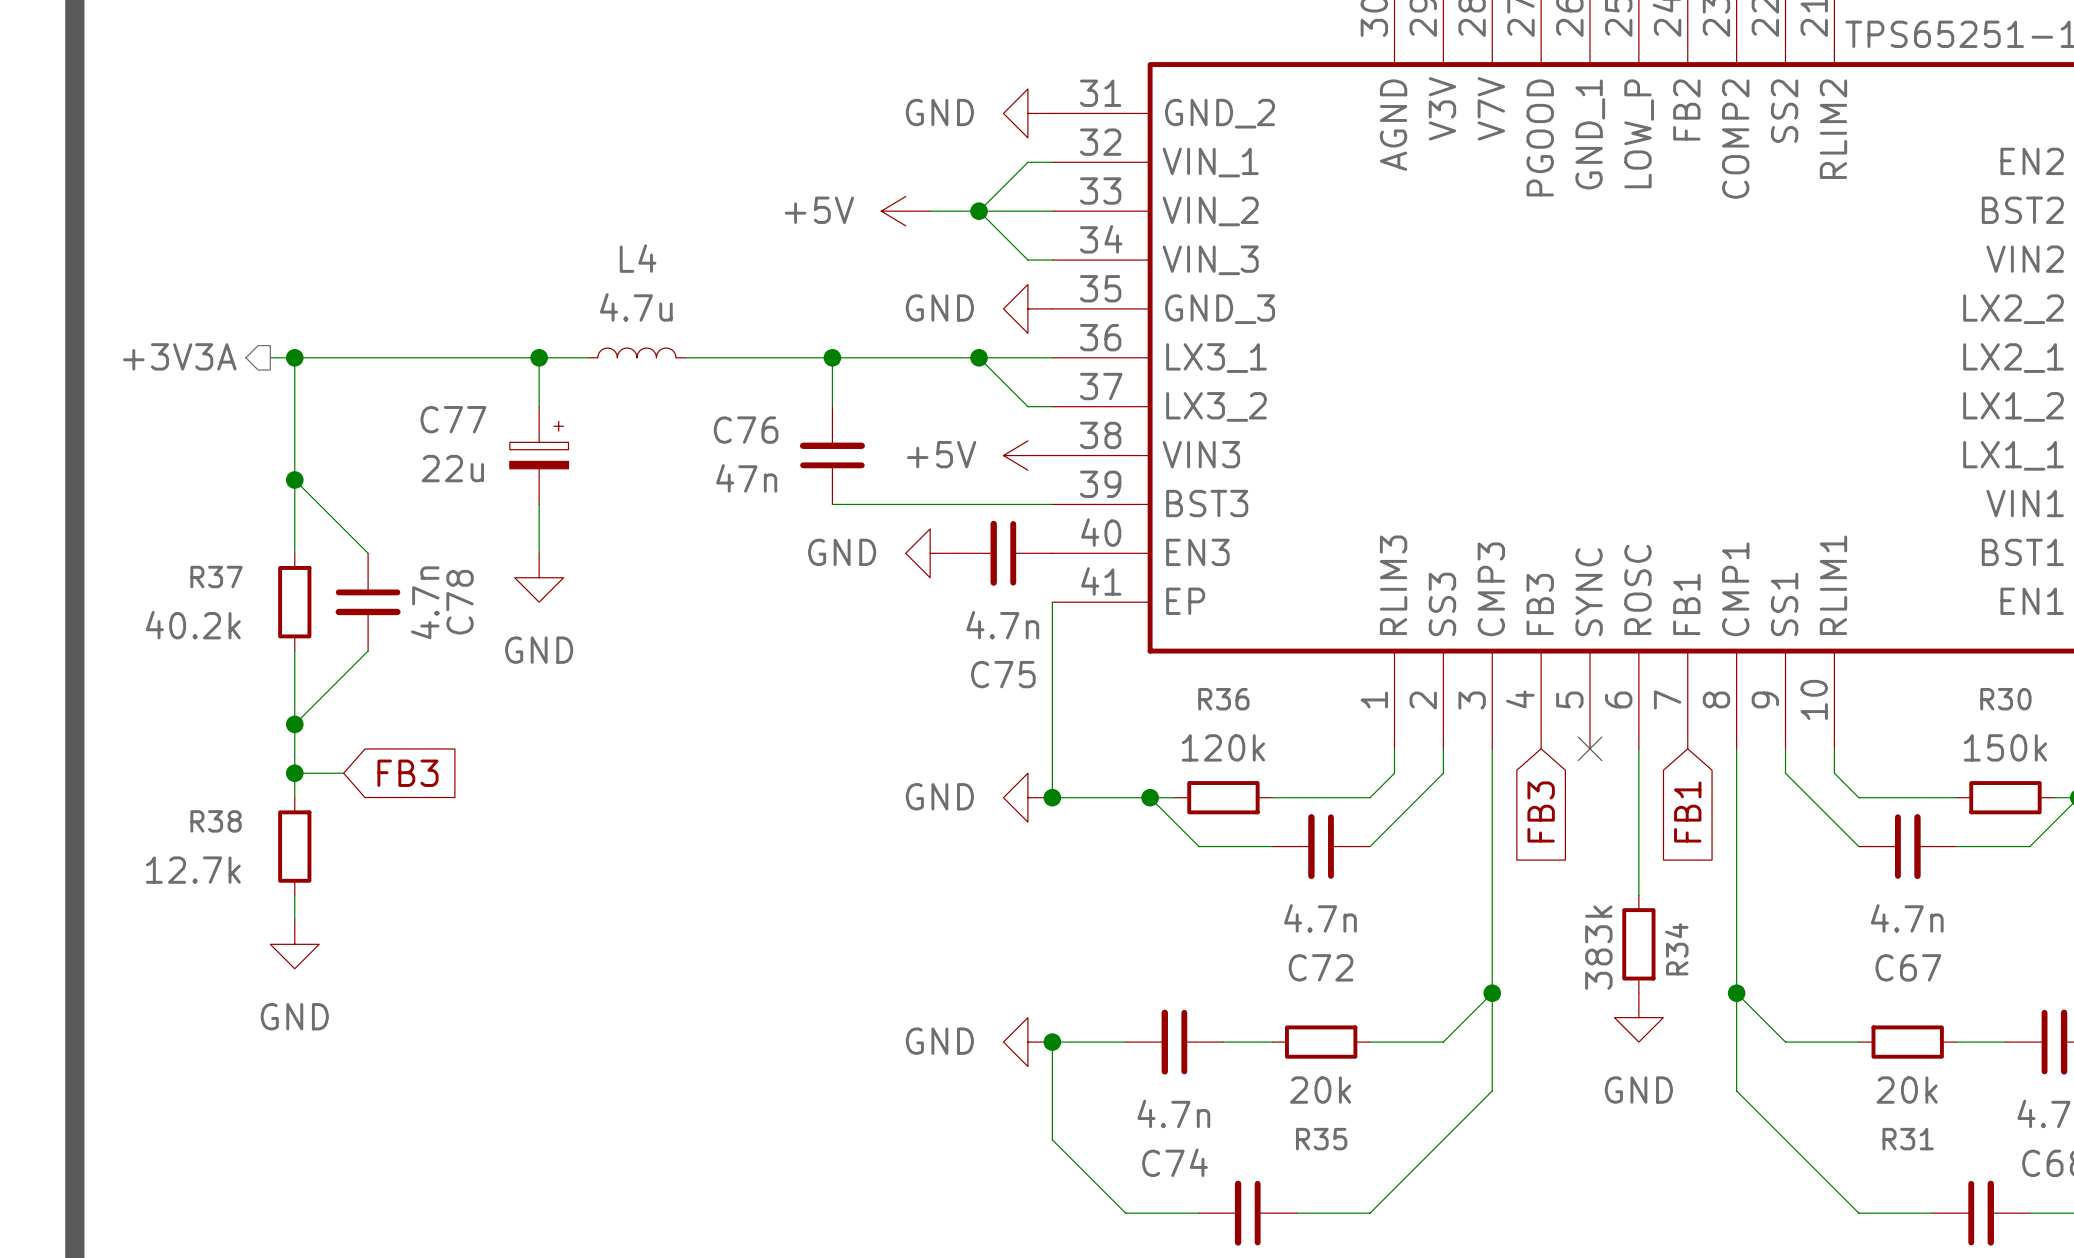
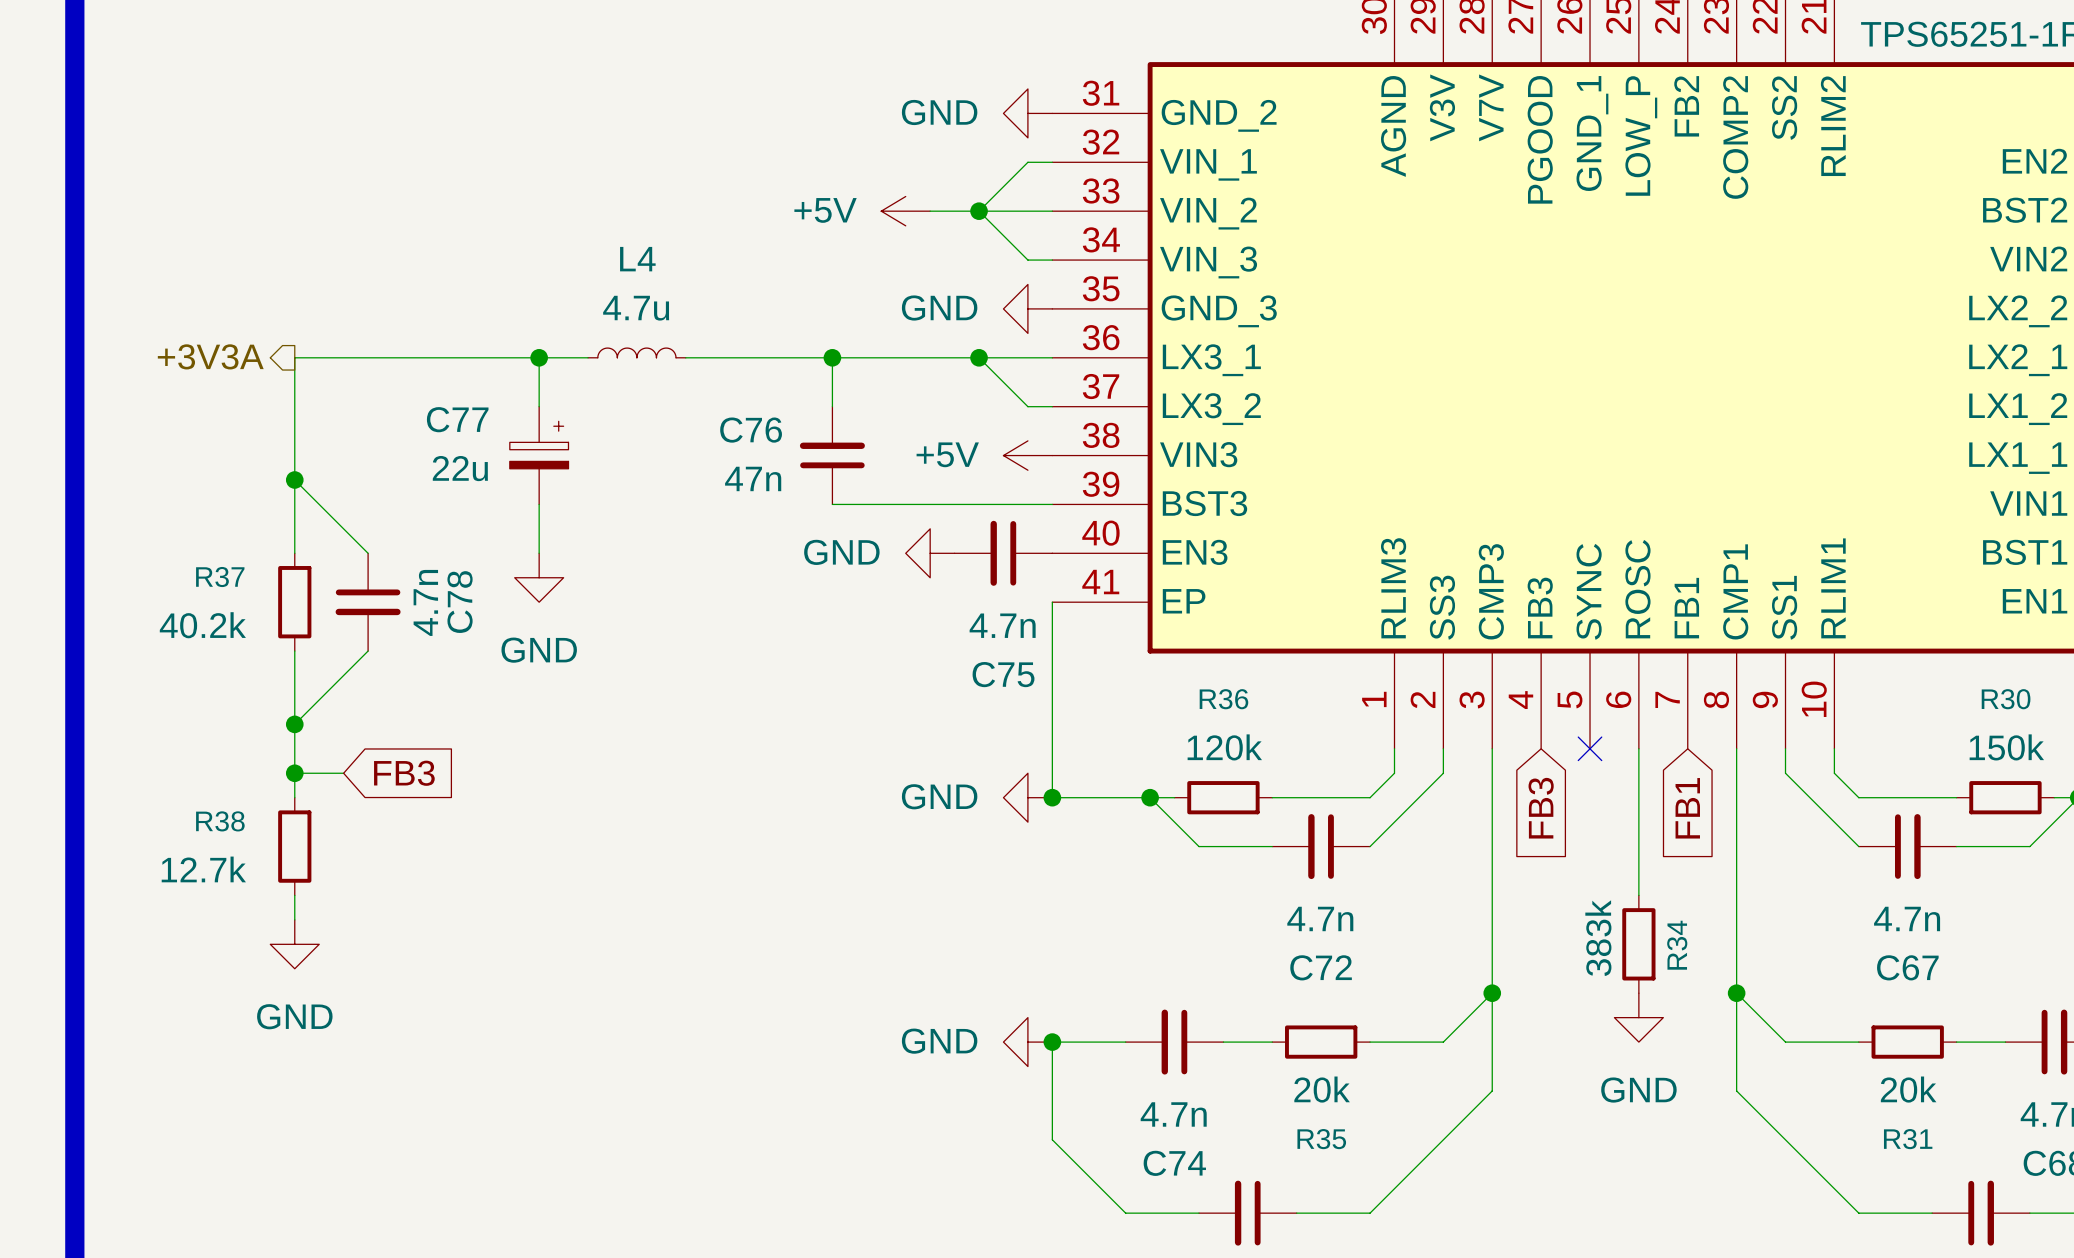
hierarchical label position: +3V3A (179, 356) -> +3V3A (210, 356)
wire: (270, 357) (294, 357) -> none
junction: (294, 357) -> none

